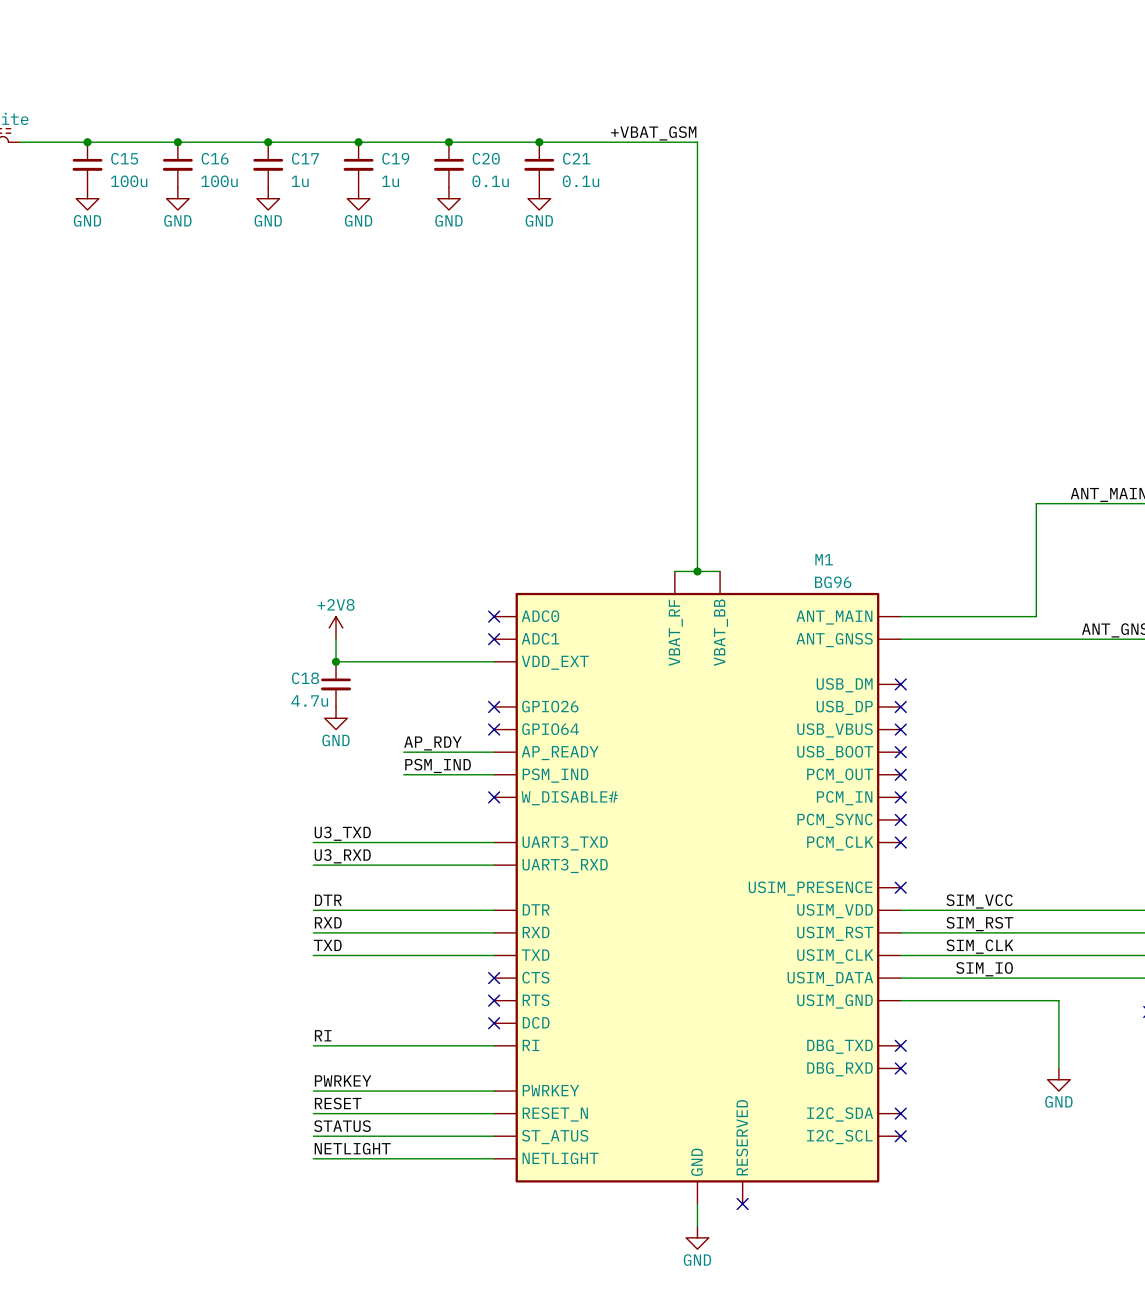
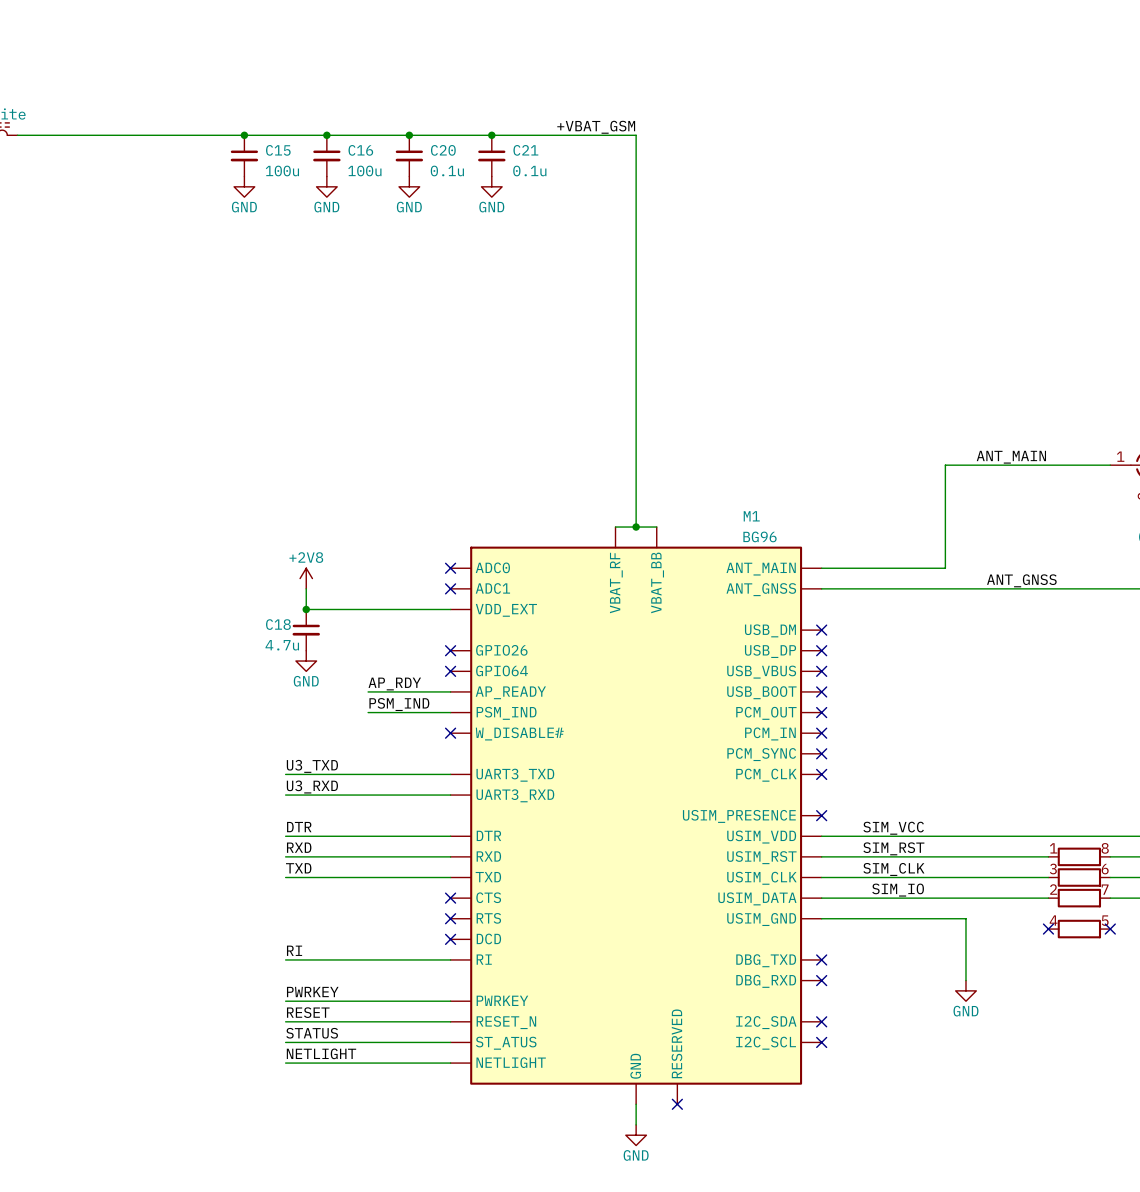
junction: (87, 142) -> none
junction: (177, 142) -> none
C17 name: C17 (305, 158) -> C15 (278, 150)
C19 name: C19 (395, 158) -> C16 (360, 150)
C15: 100u (87, 164) -> none
C16: 100u (177, 164) -> none
C17 value: 1u (300, 181) -> 100u (282, 170)
C19 value: 1u (390, 181) -> 100u (364, 170)
power symbol: GND (87, 198) -> none
power symbol: GND (177, 198) -> none

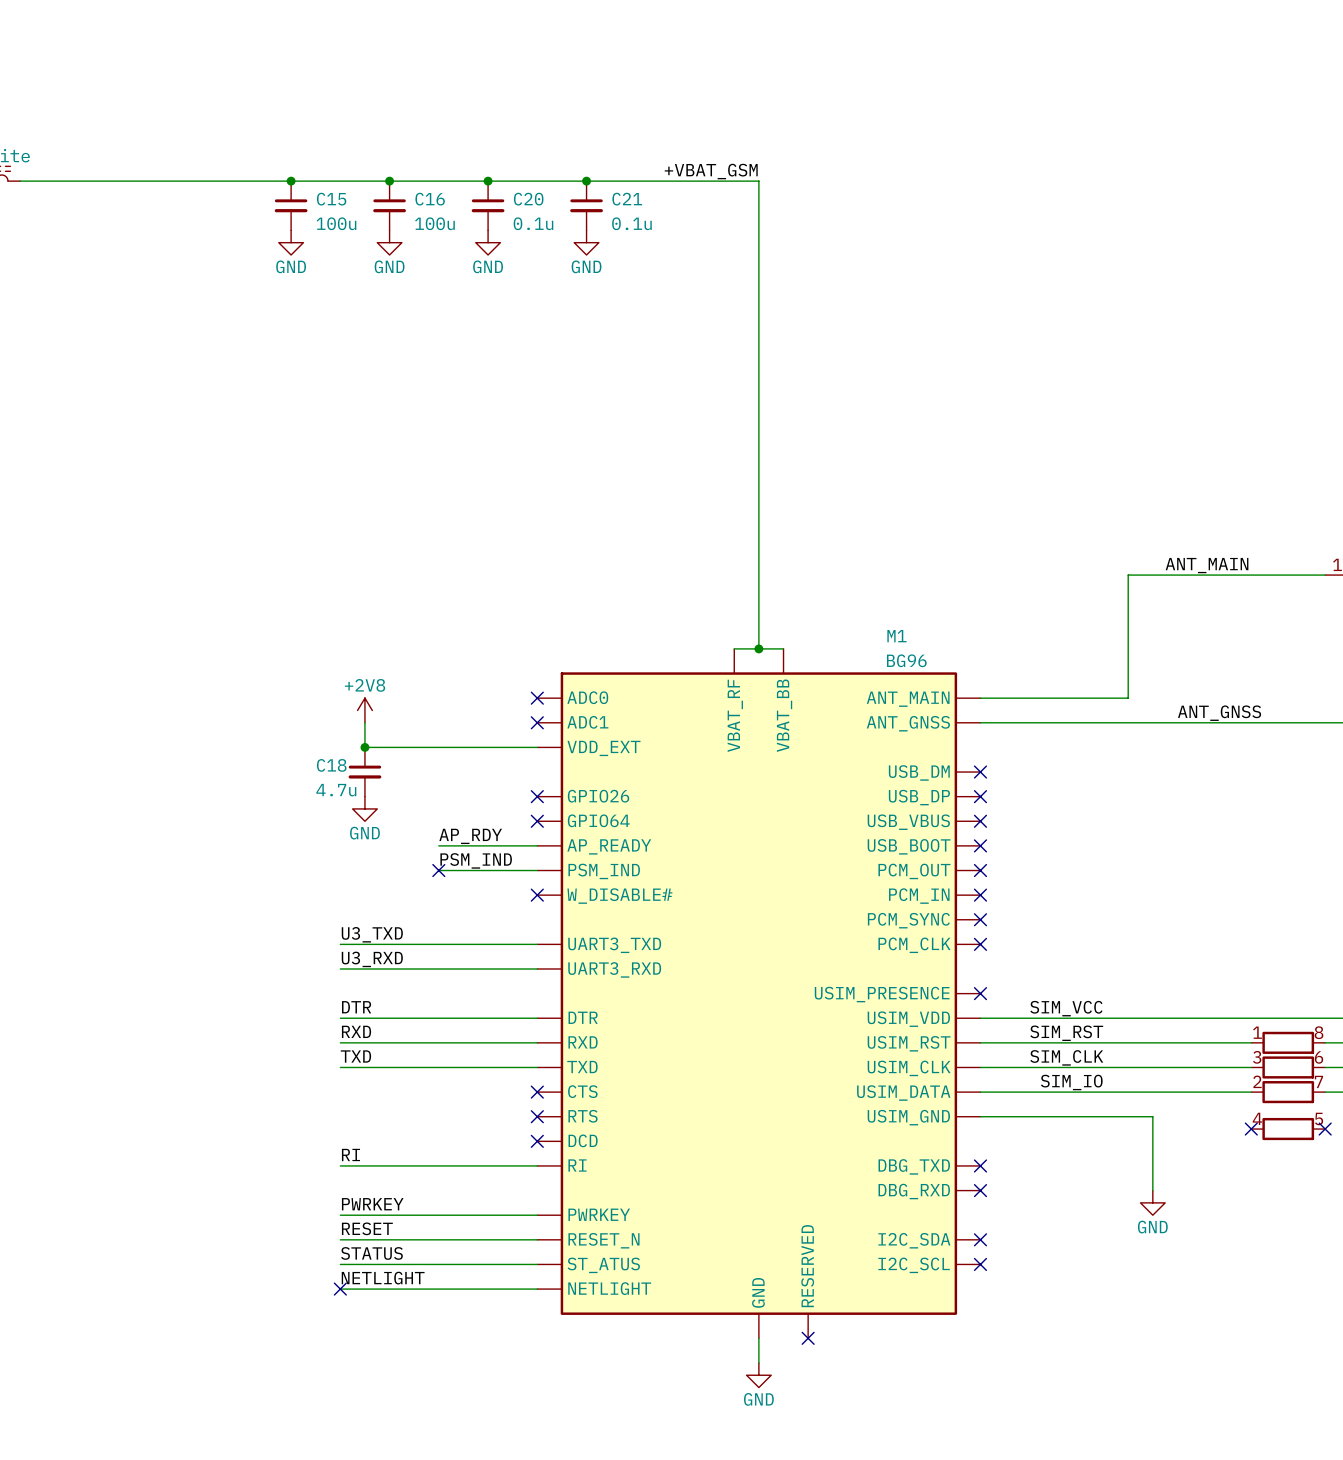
no-connect mark: none -> (438, 870)
no-connect mark: none -> (340, 1289)

